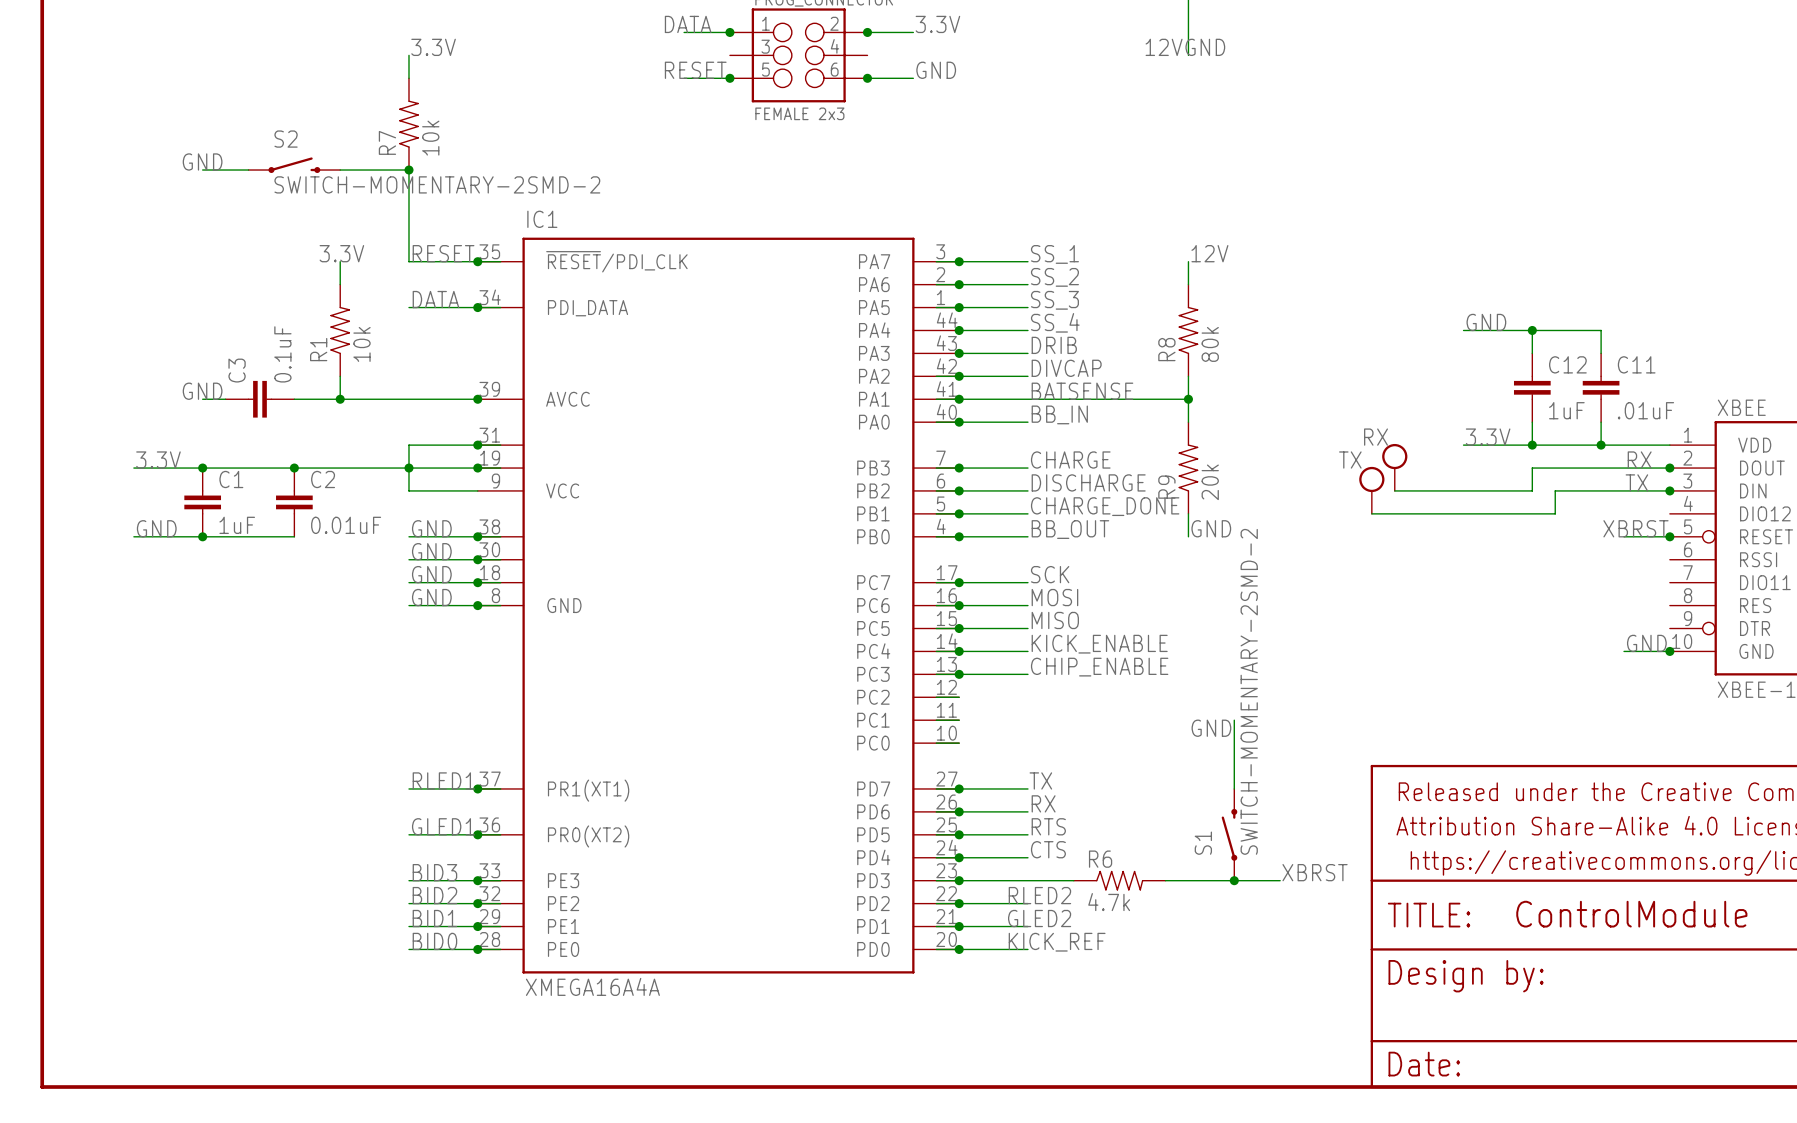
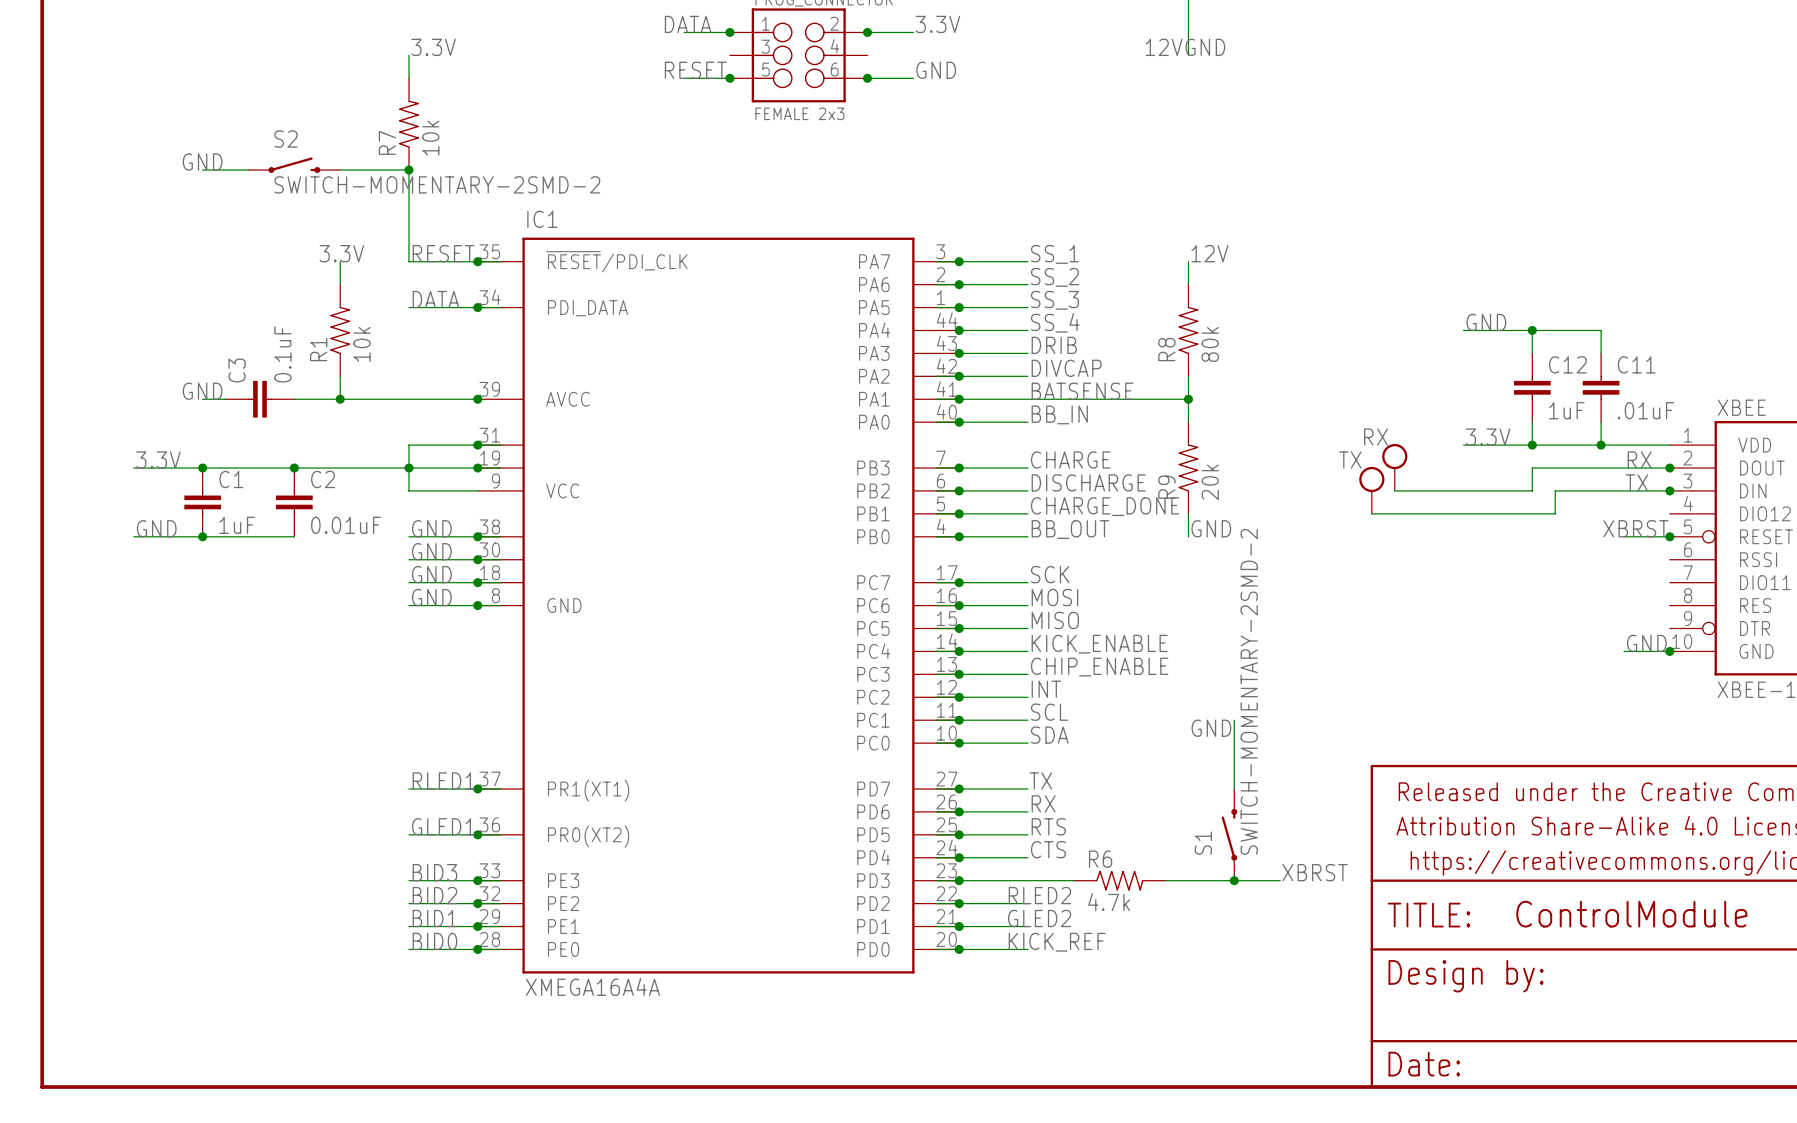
label: none -> INT (1046, 689)
wire: none -> (959, 697) (1027, 697)
junction: none -> (959, 697)
label: none -> SCL (1049, 712)
wire: none -> (959, 720) (1027, 720)
junction: none -> (959, 720)
label: none -> SDA (1049, 735)
wire: none -> (959, 743) (1027, 743)
junction: none -> (959, 743)

